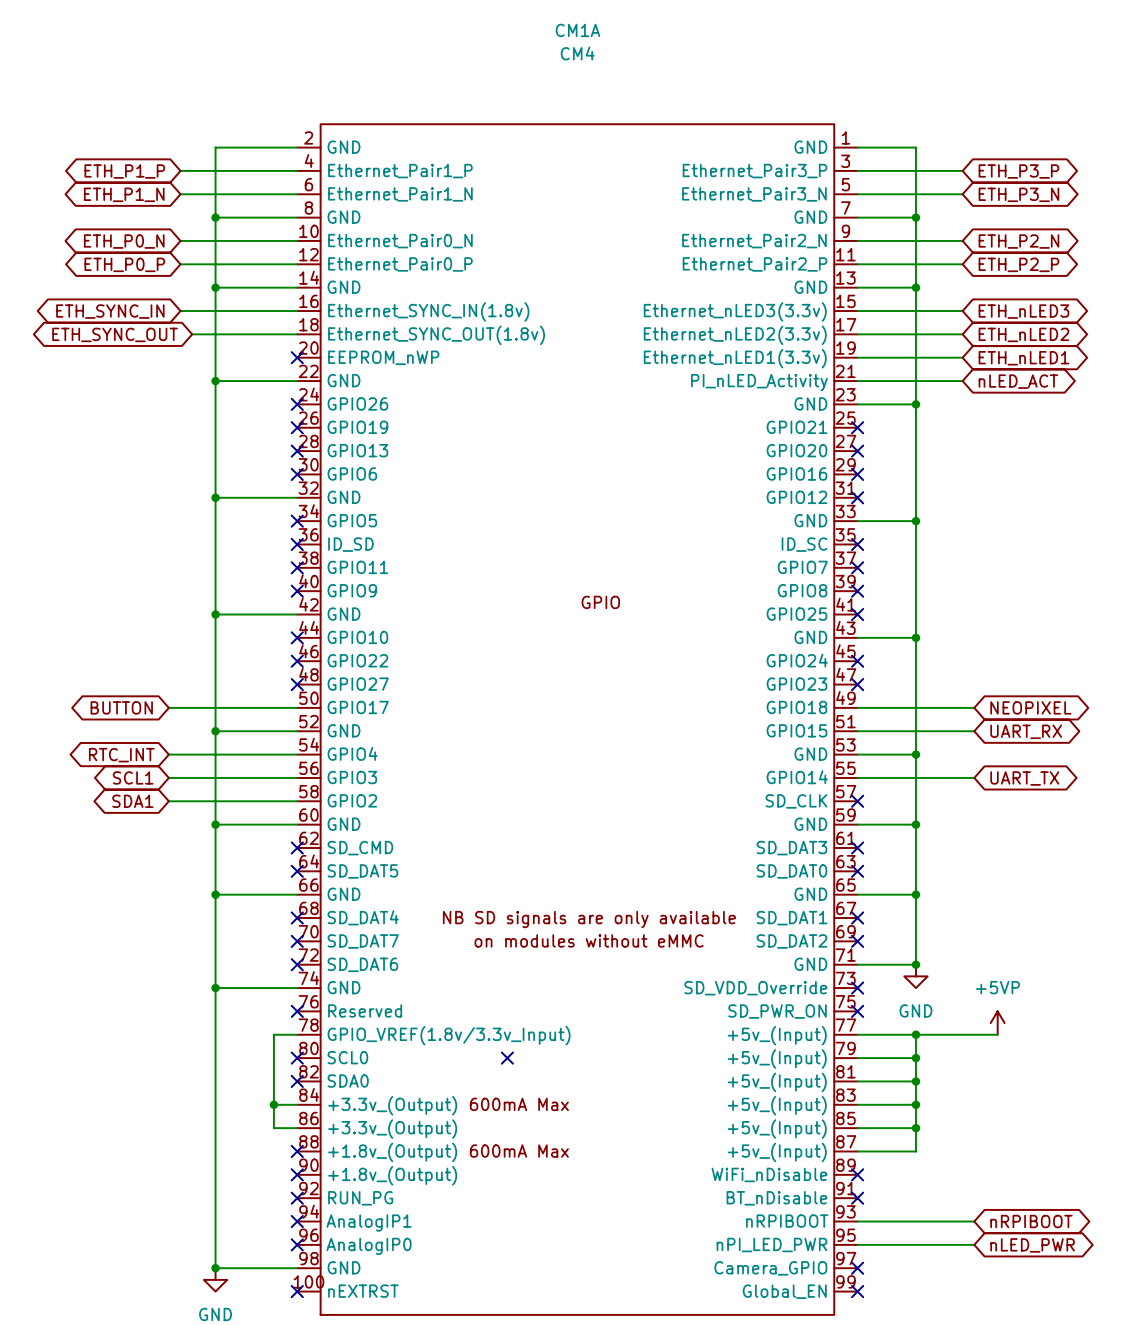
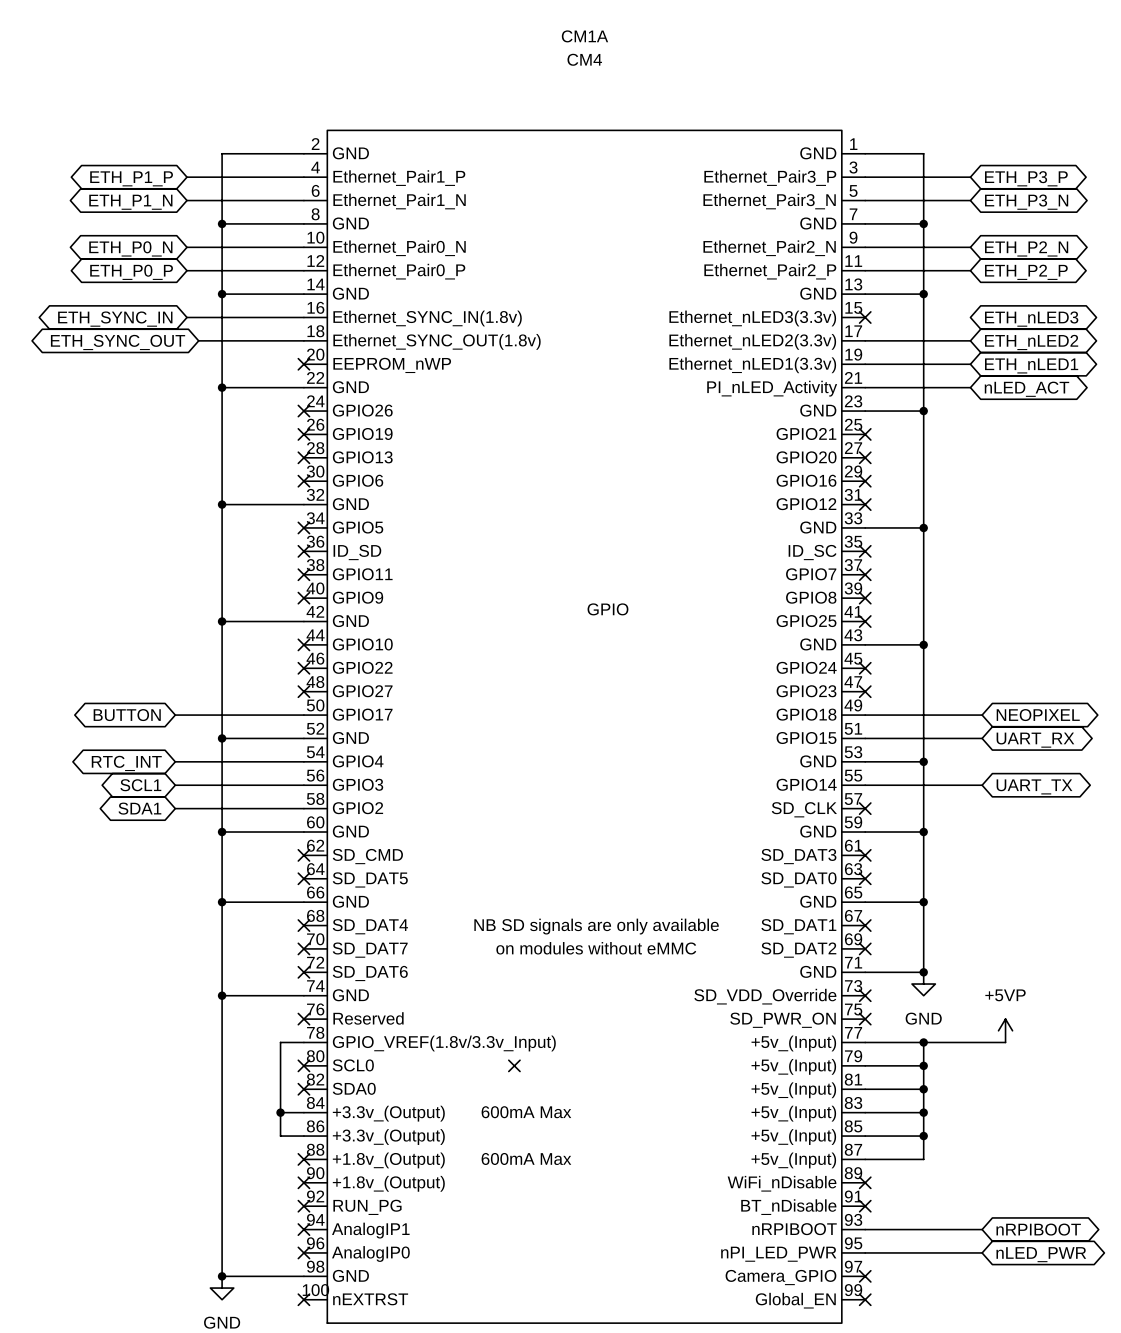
wire: (857, 311) (962, 311) -> none
no-connect mark: none -> (865, 317)

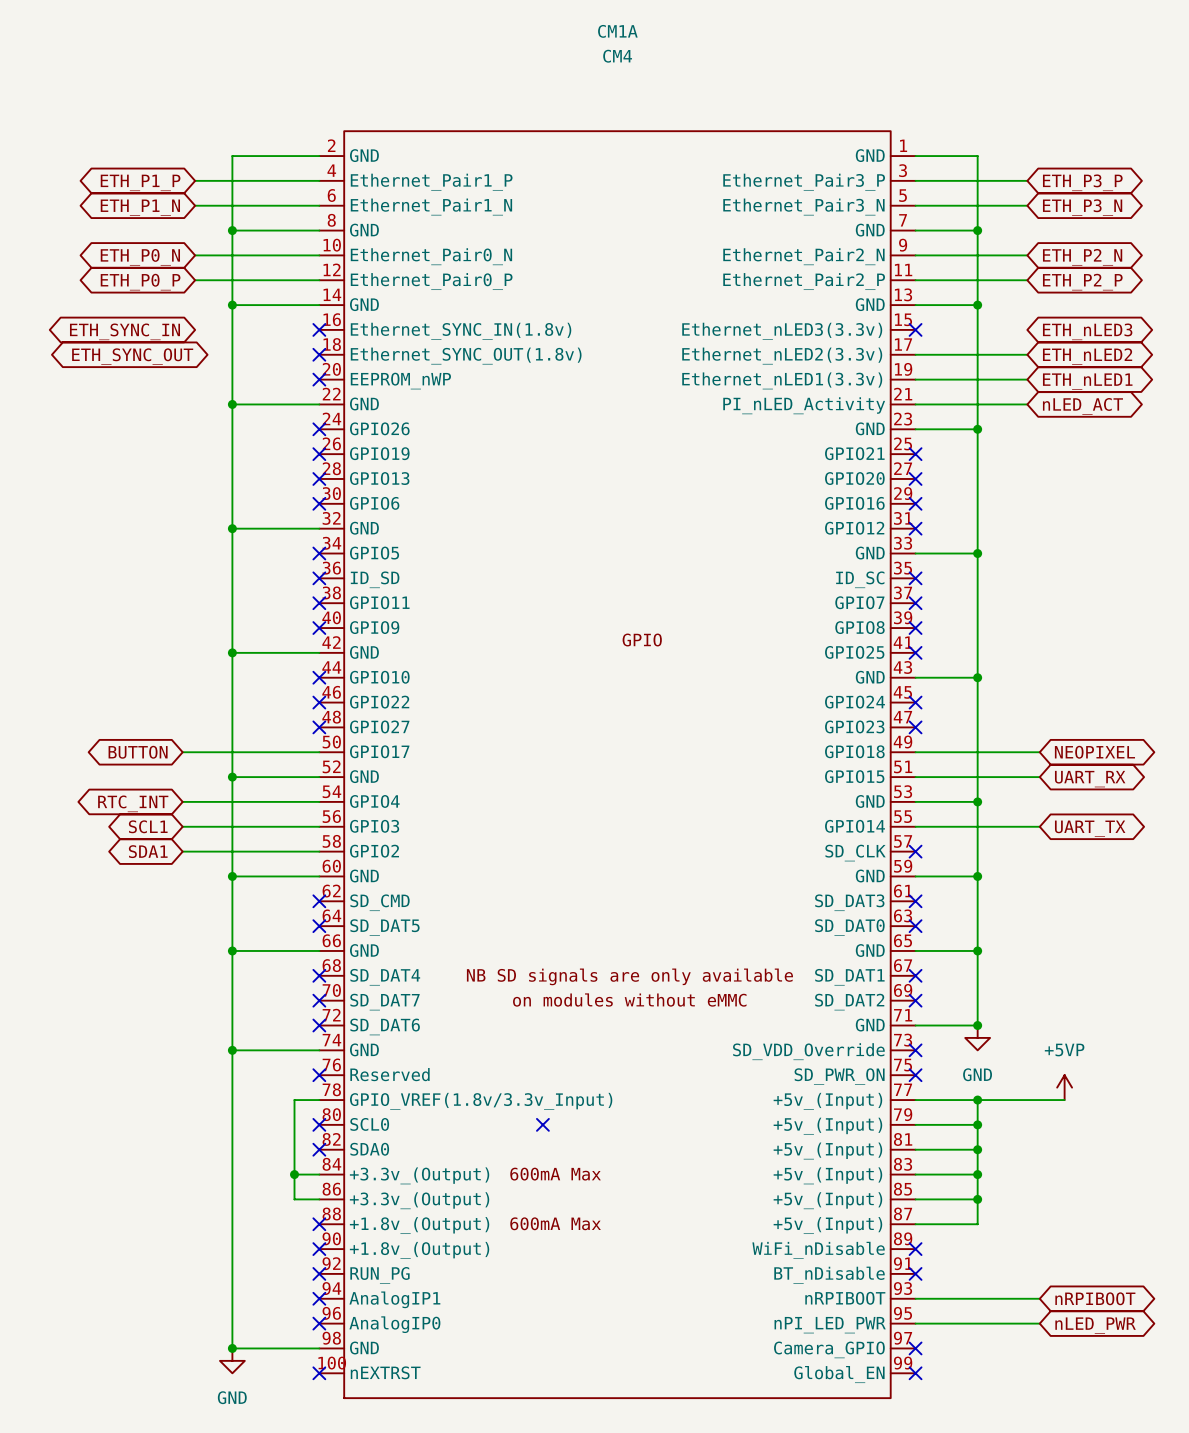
wire: (186, 317) (303, 317) -> none
no-connect mark: none -> (319, 329)
wire: (198, 340) (303, 340) -> none
no-connect mark: none -> (319, 354)

